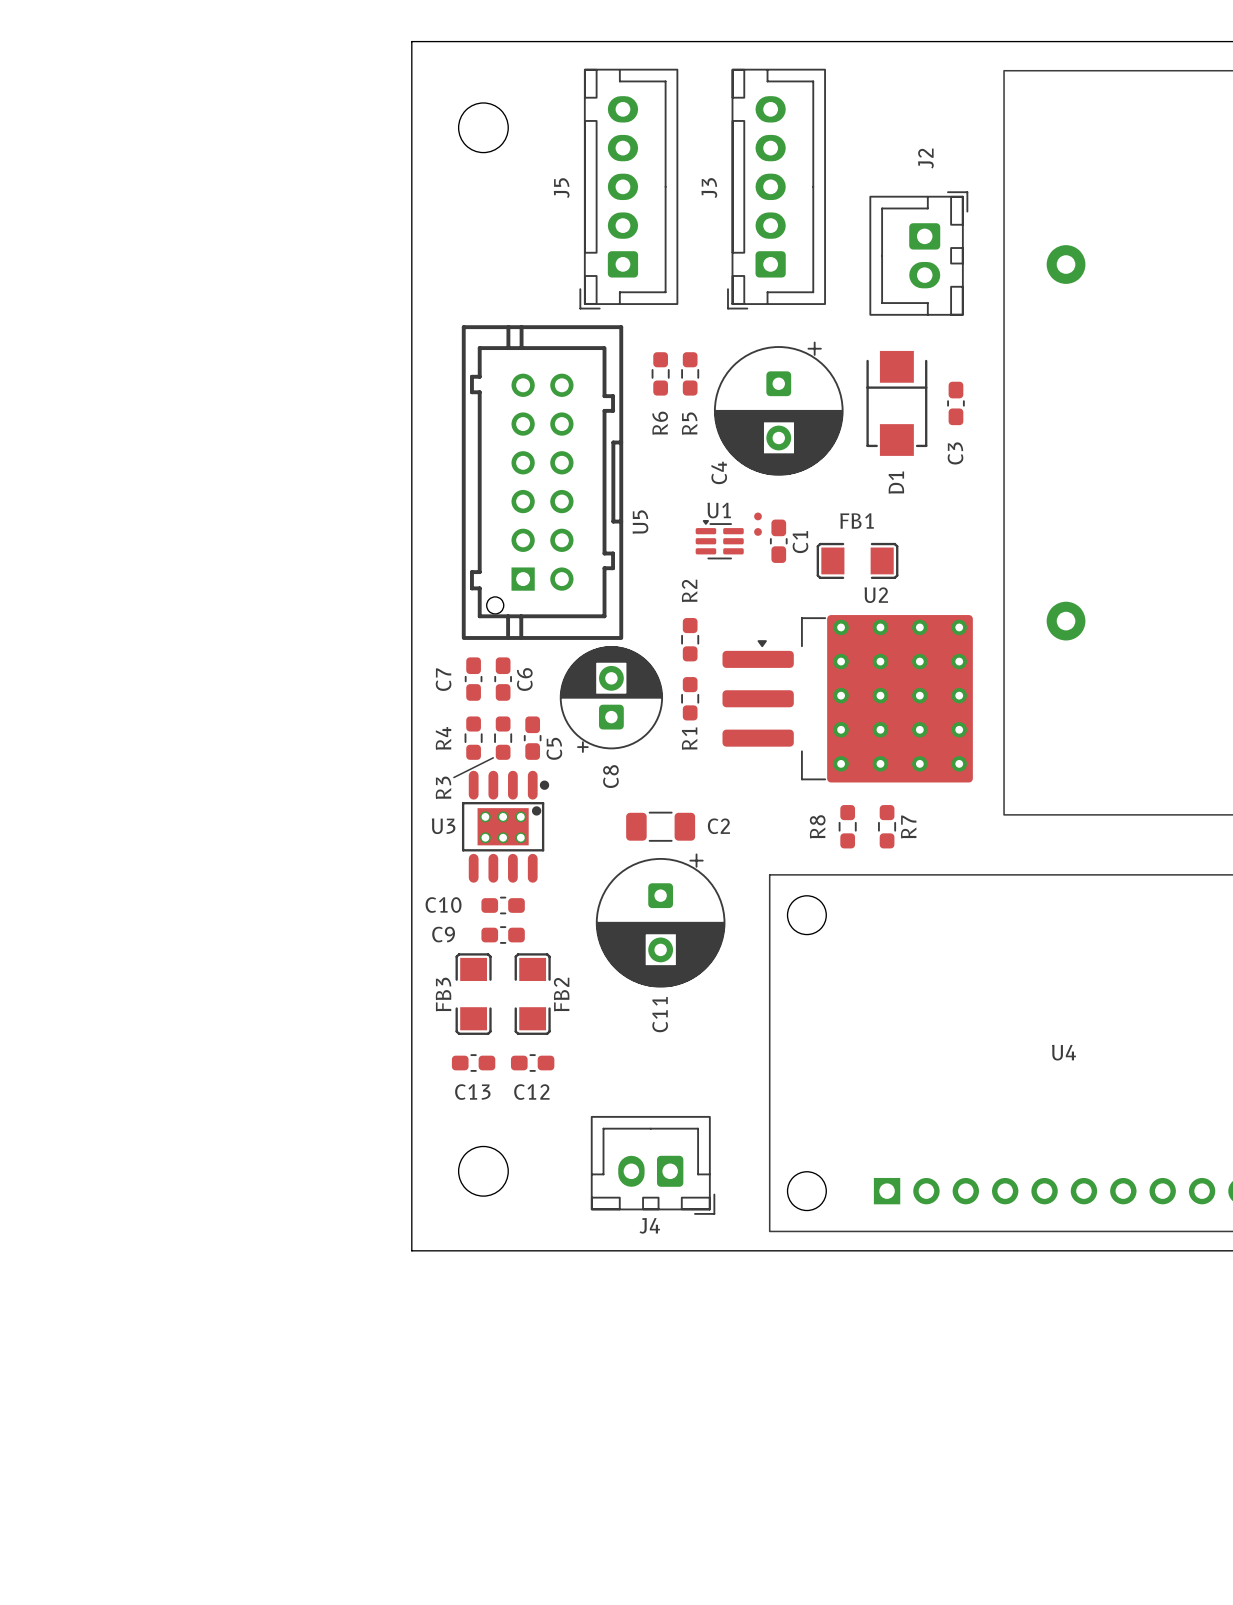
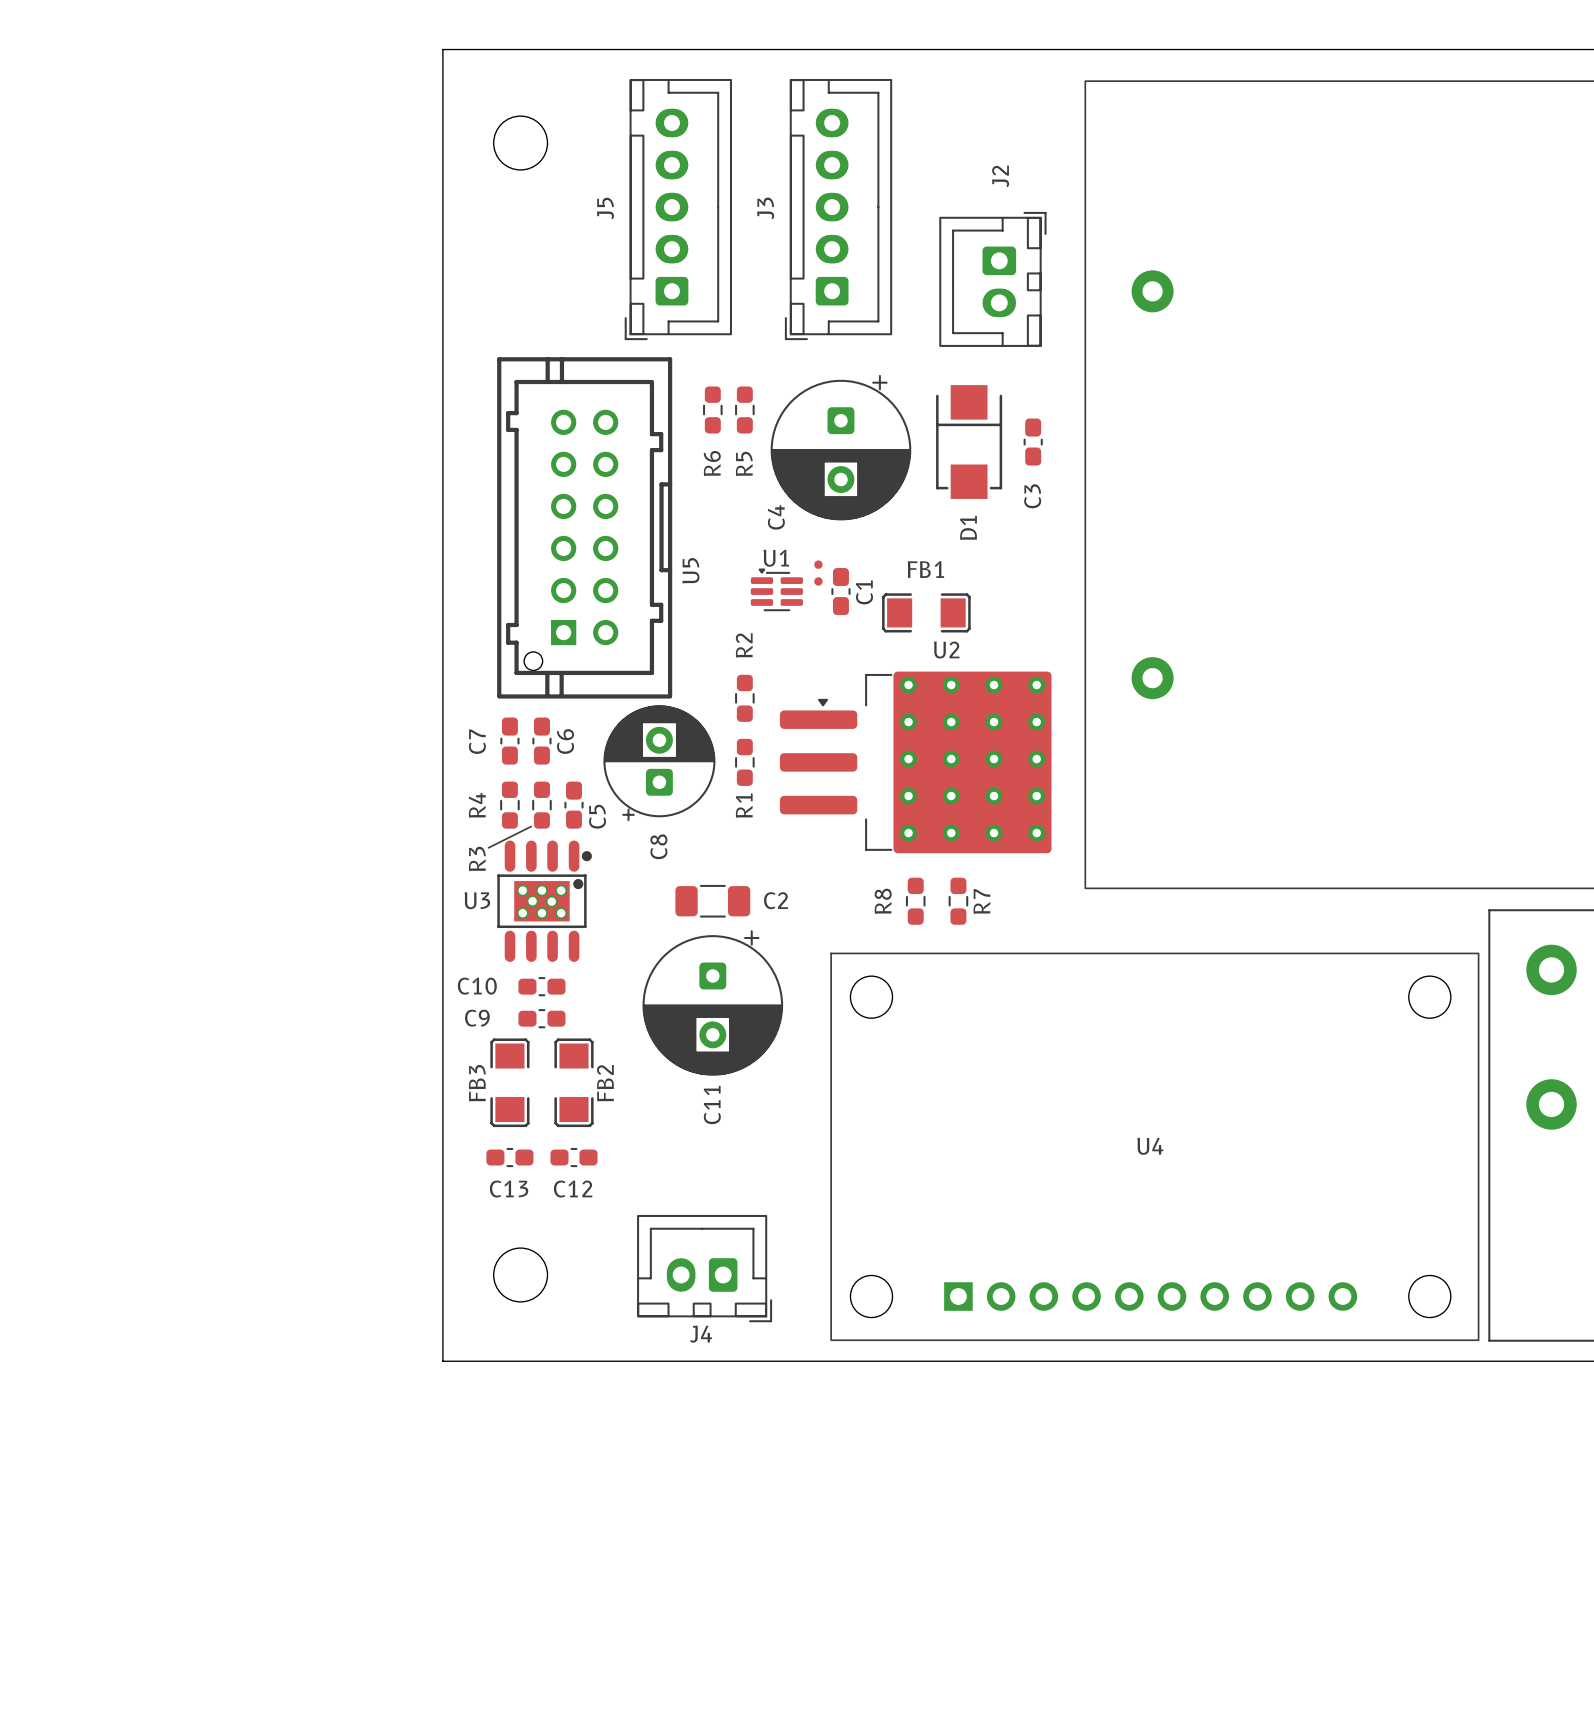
U3 footprint: [461, 770, 550, 883] -> [497, 840, 592, 962]

